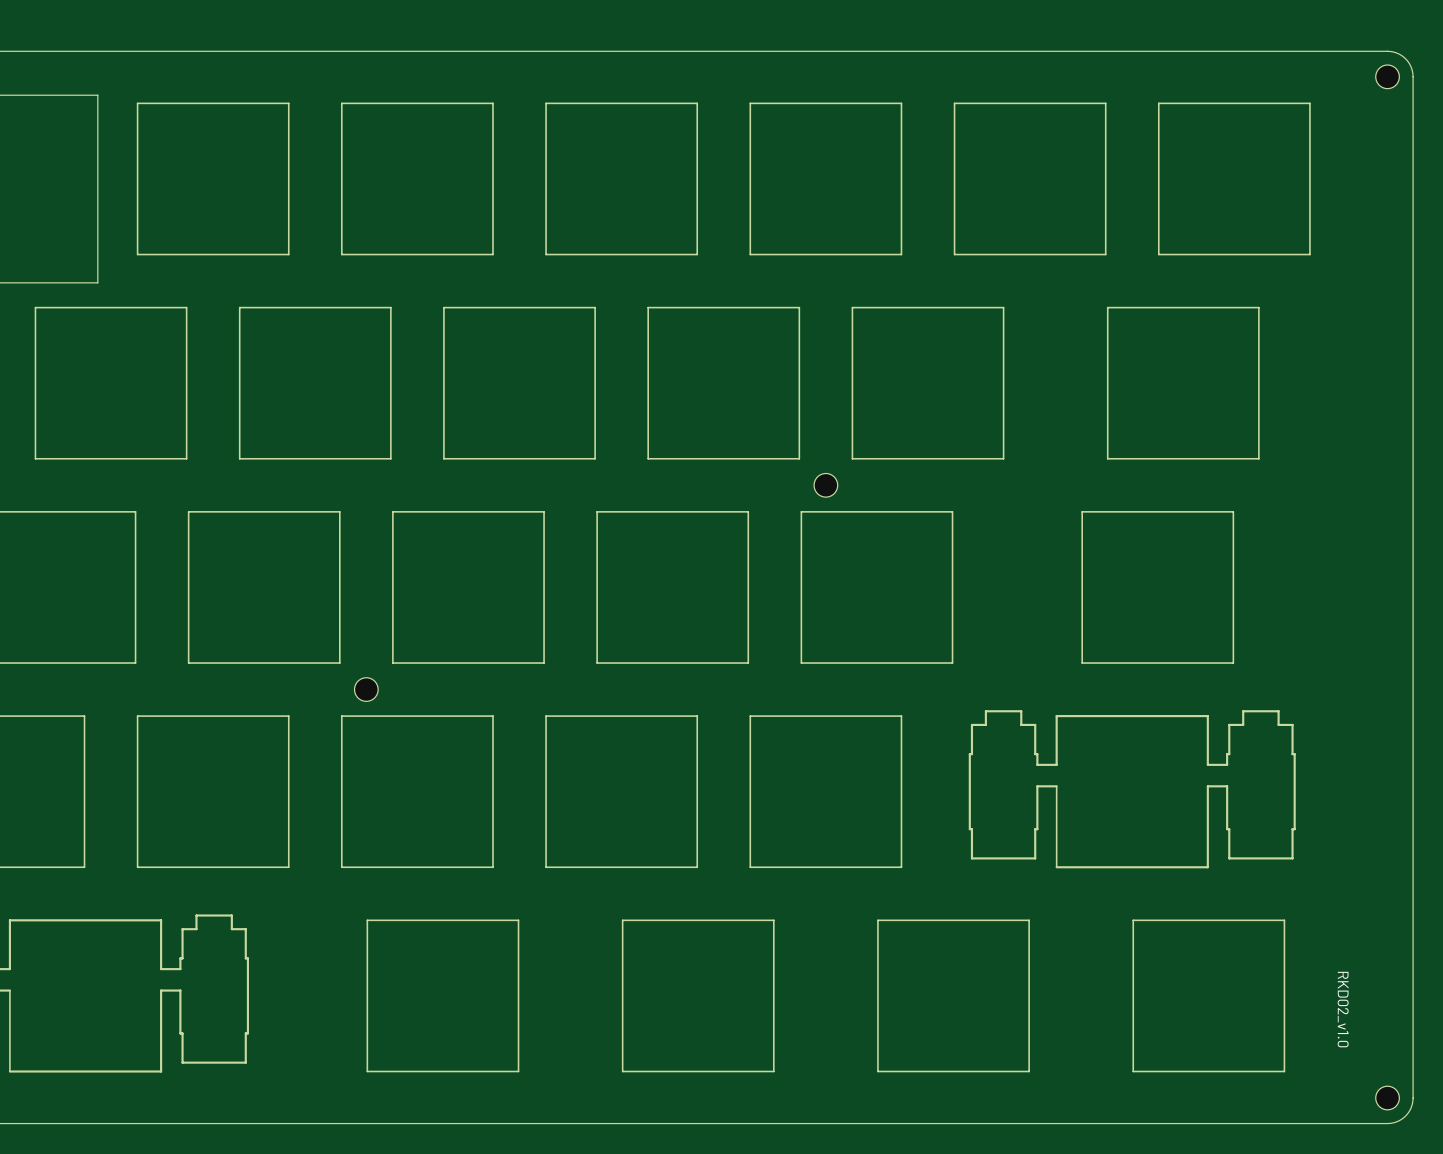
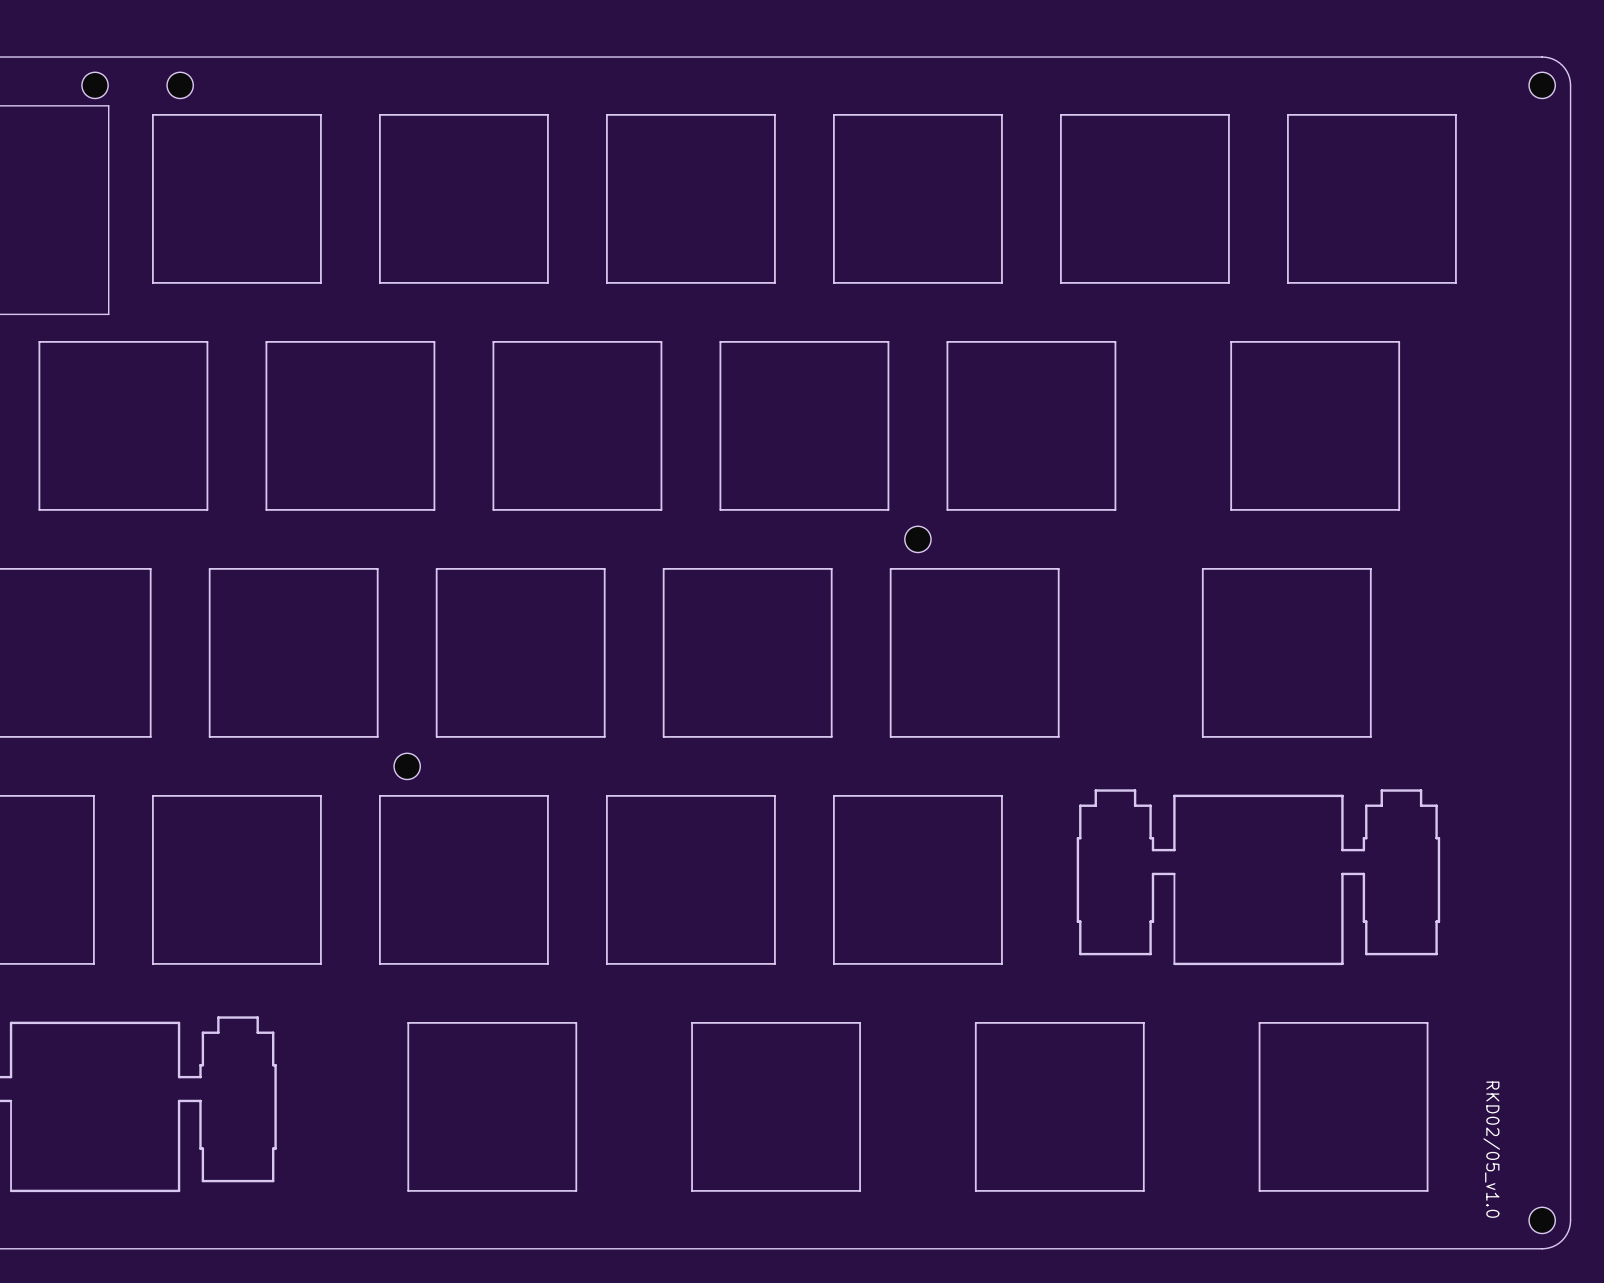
part: none -> (95, 85)
part: none -> (180, 85)
text: RKD02_v1.0 (1343, 1009) -> RKD02/05_v1.0 (1491, 1149)

